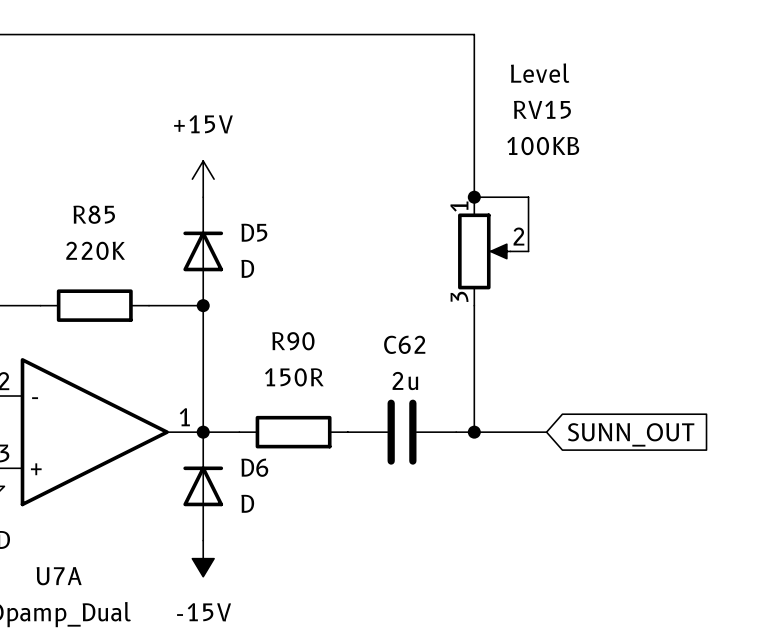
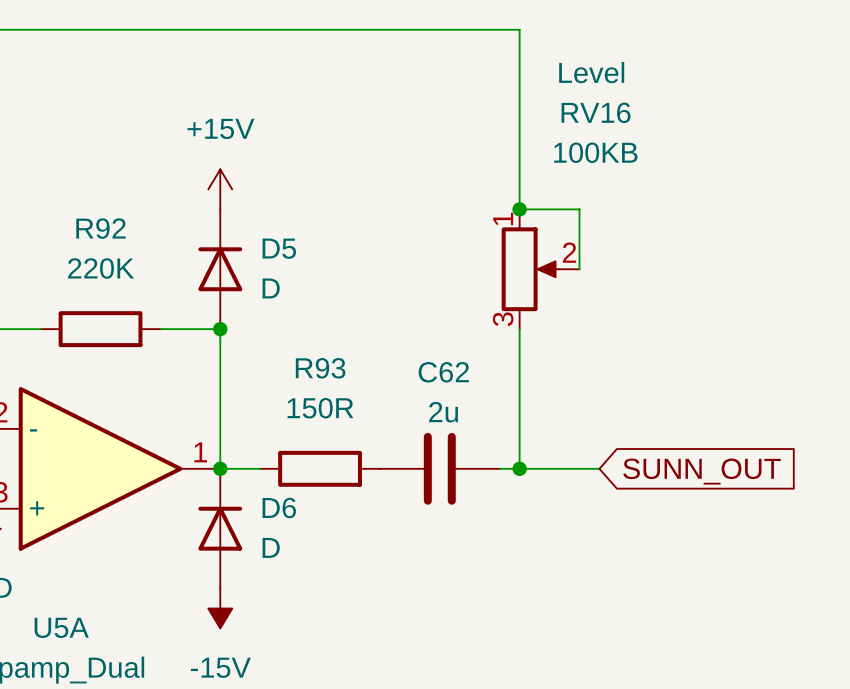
RV15 name: RV15 (542, 109) -> RV16 (596, 112)
R85 name: R85 (94, 214) -> R92 (101, 228)
R90 name: R90 (293, 341) -> R93 (320, 368)
U7A name: U7A (59, 576) -> U5A (61, 627)

